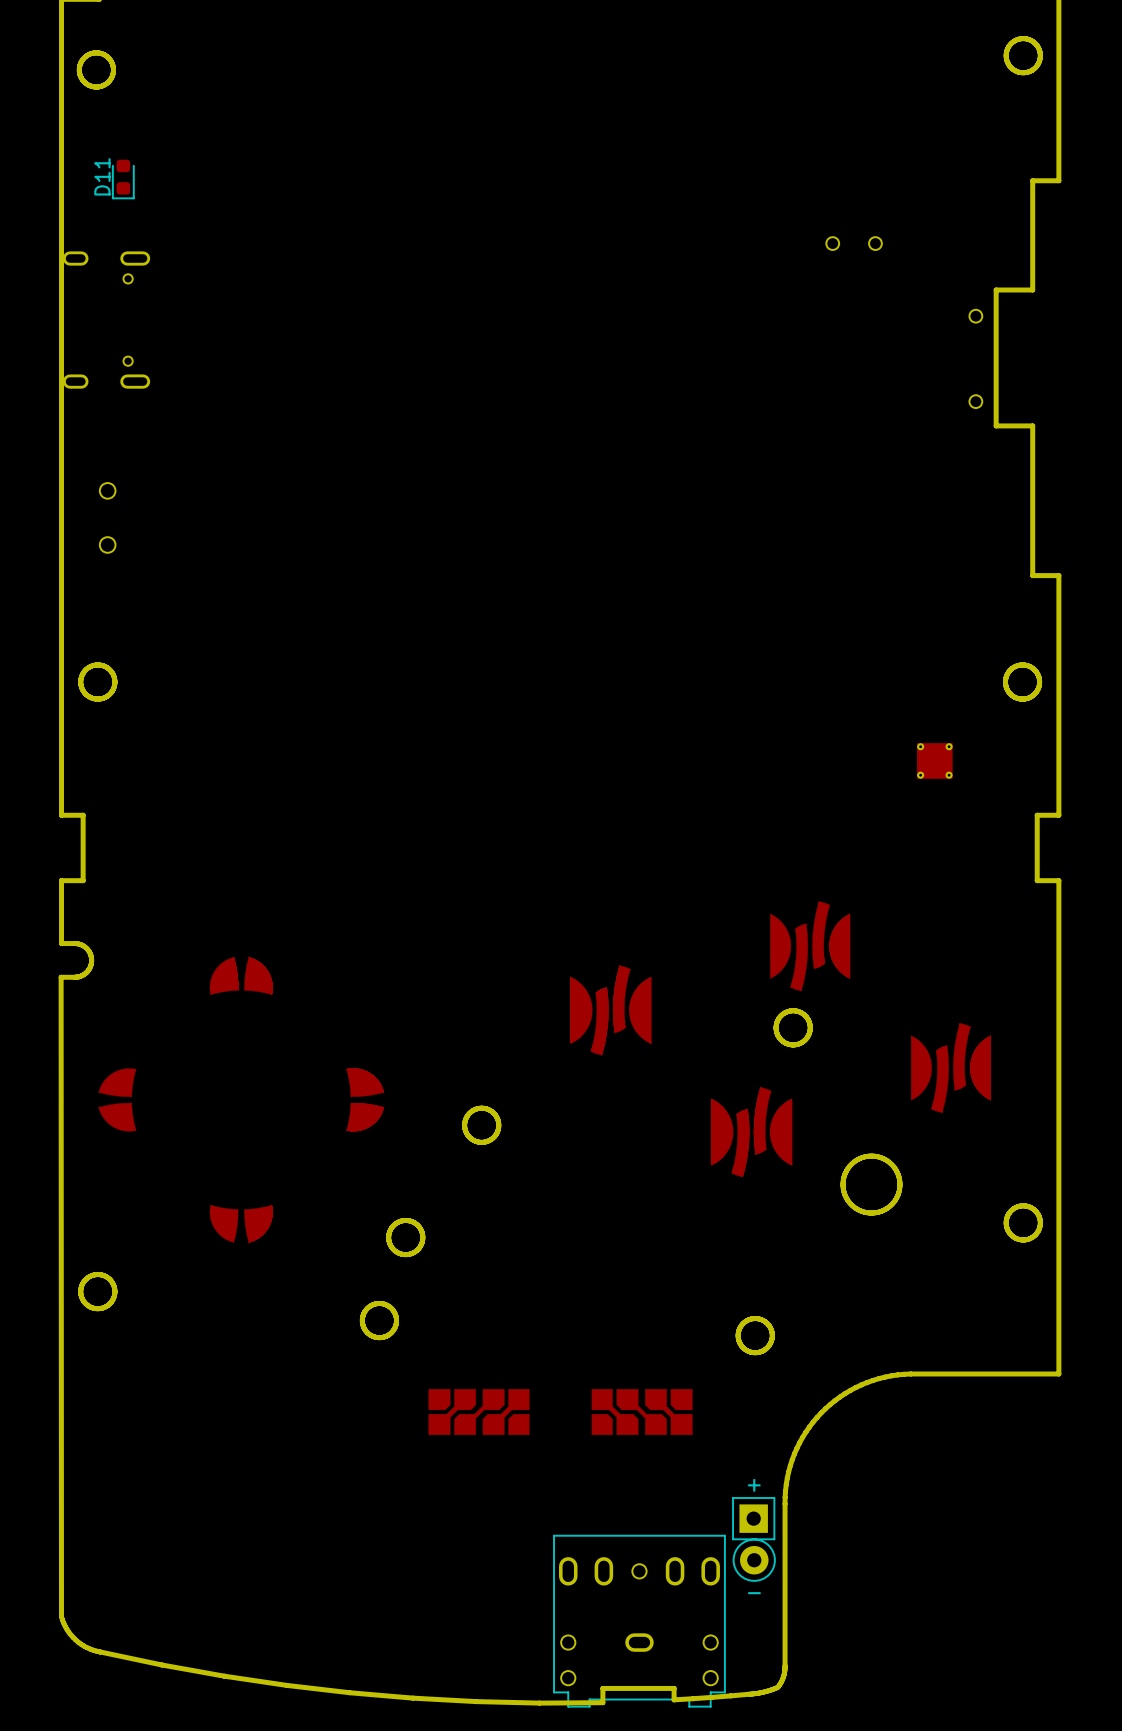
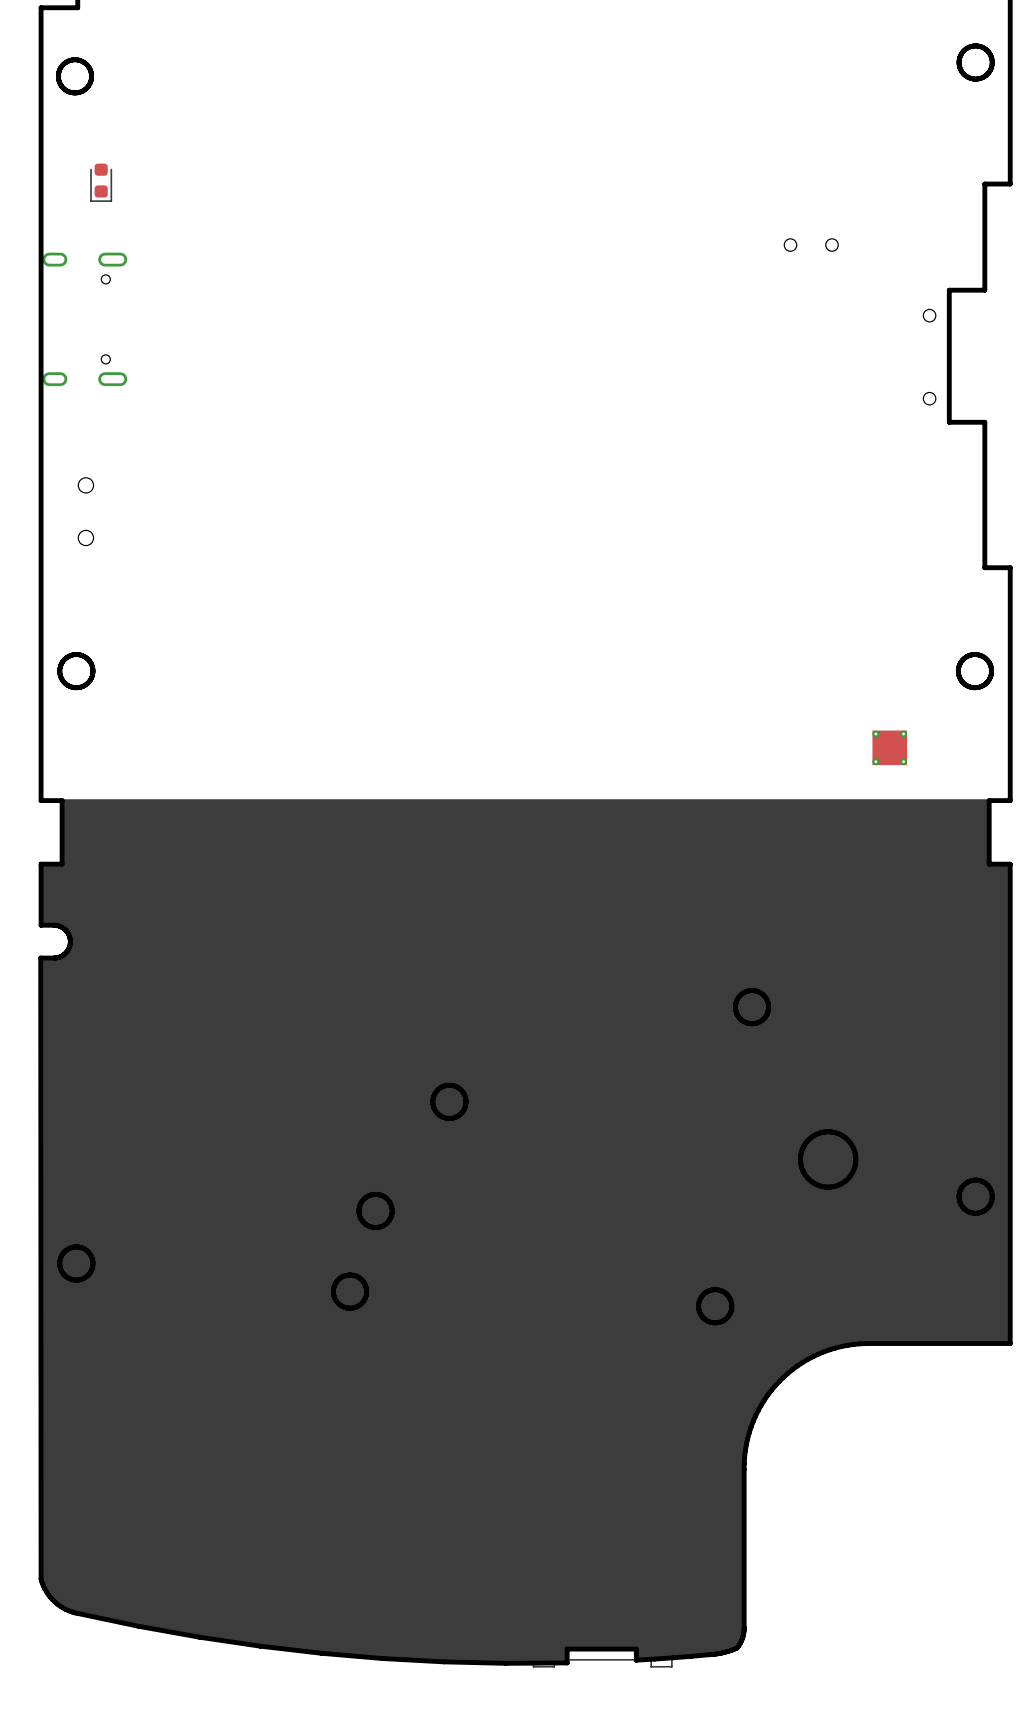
D11 name: D11 (102, 176) -> none
drawing: none -> [40, 799, 1012, 1664]

